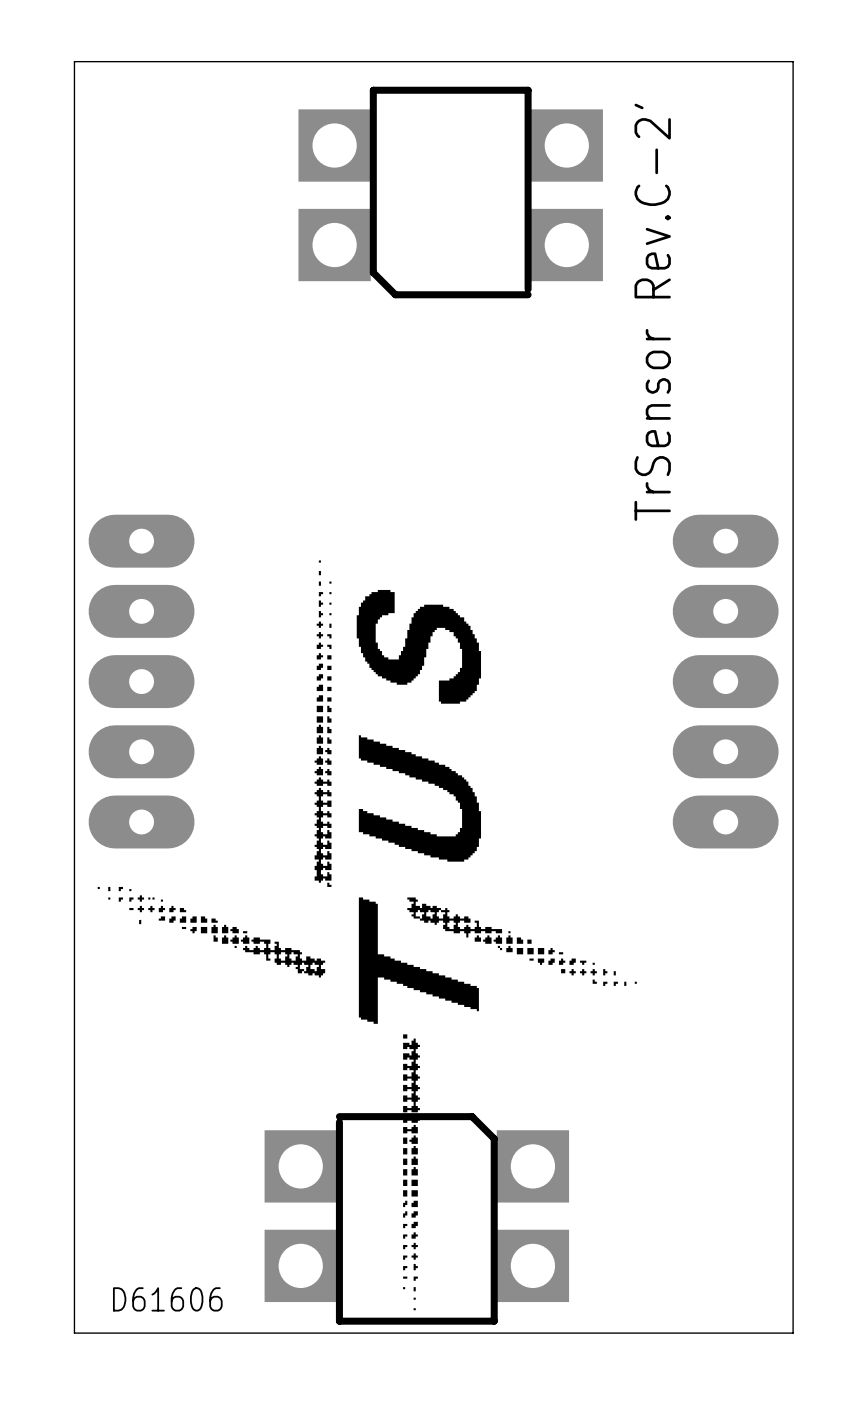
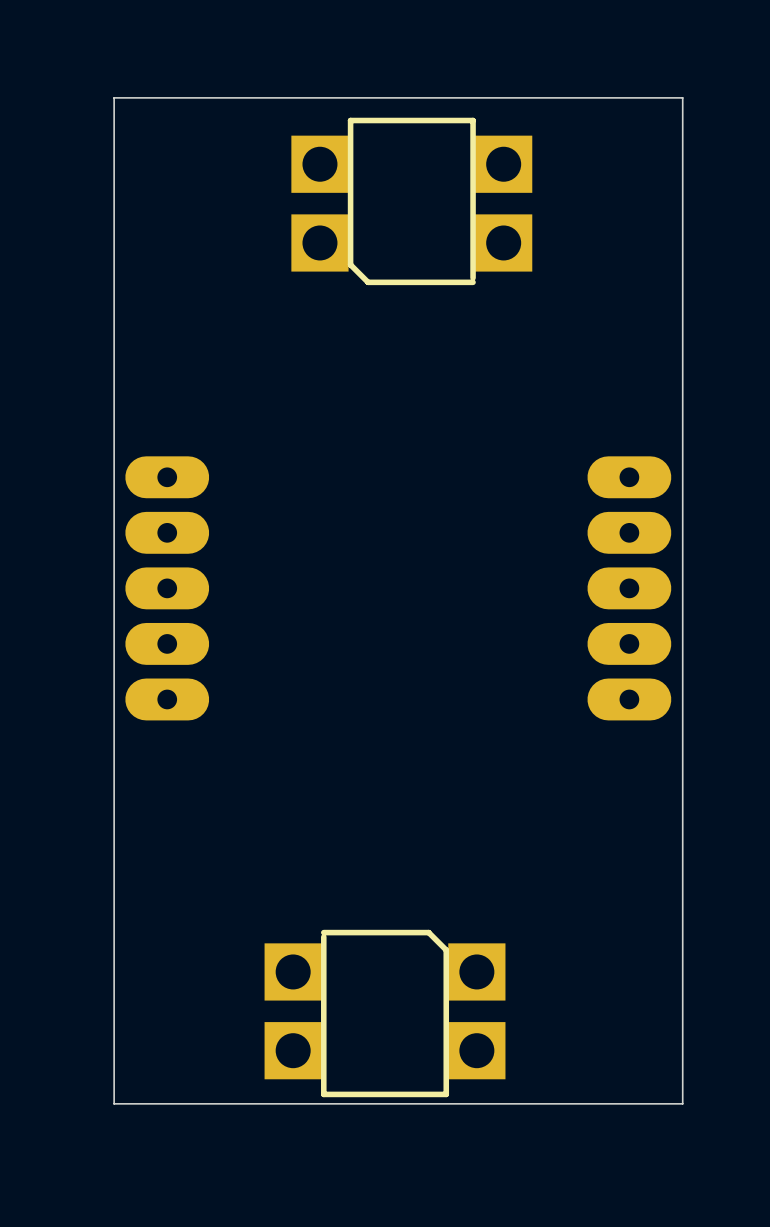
text: TrSensor Rev.C-2' (652, 312) -> none
drawing: [97, 560, 637, 1311] -> none
text: D61606 (167, 1299) -> none

